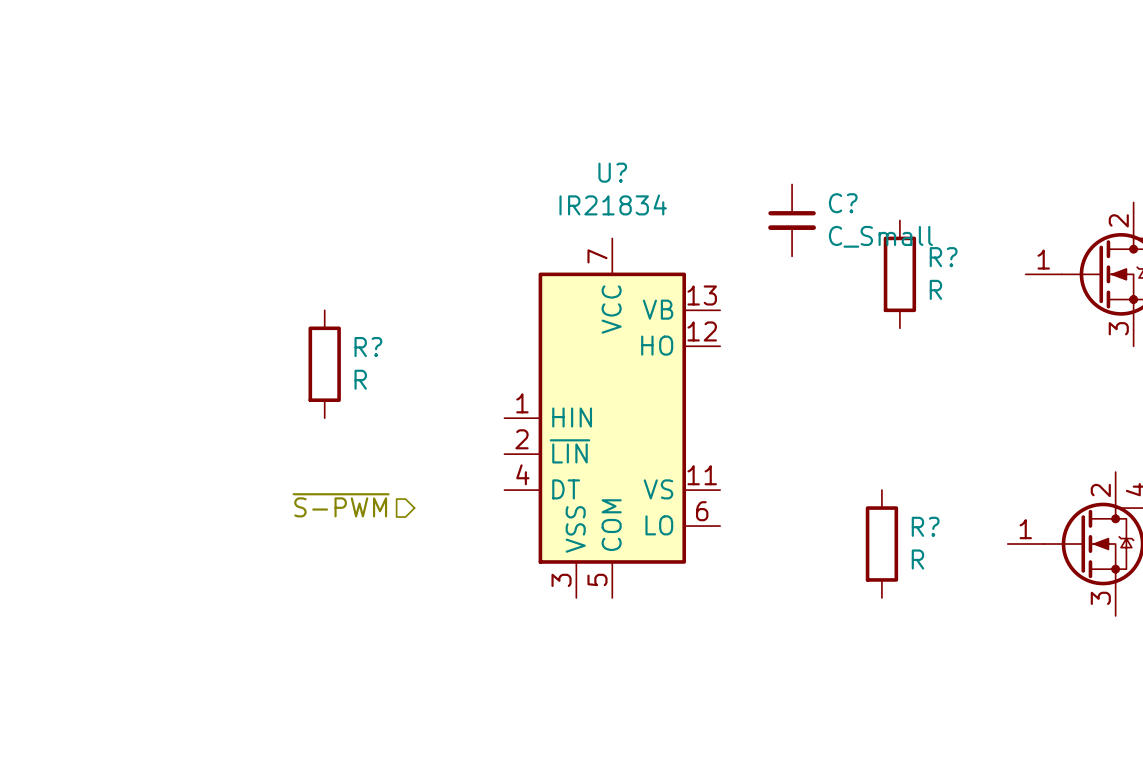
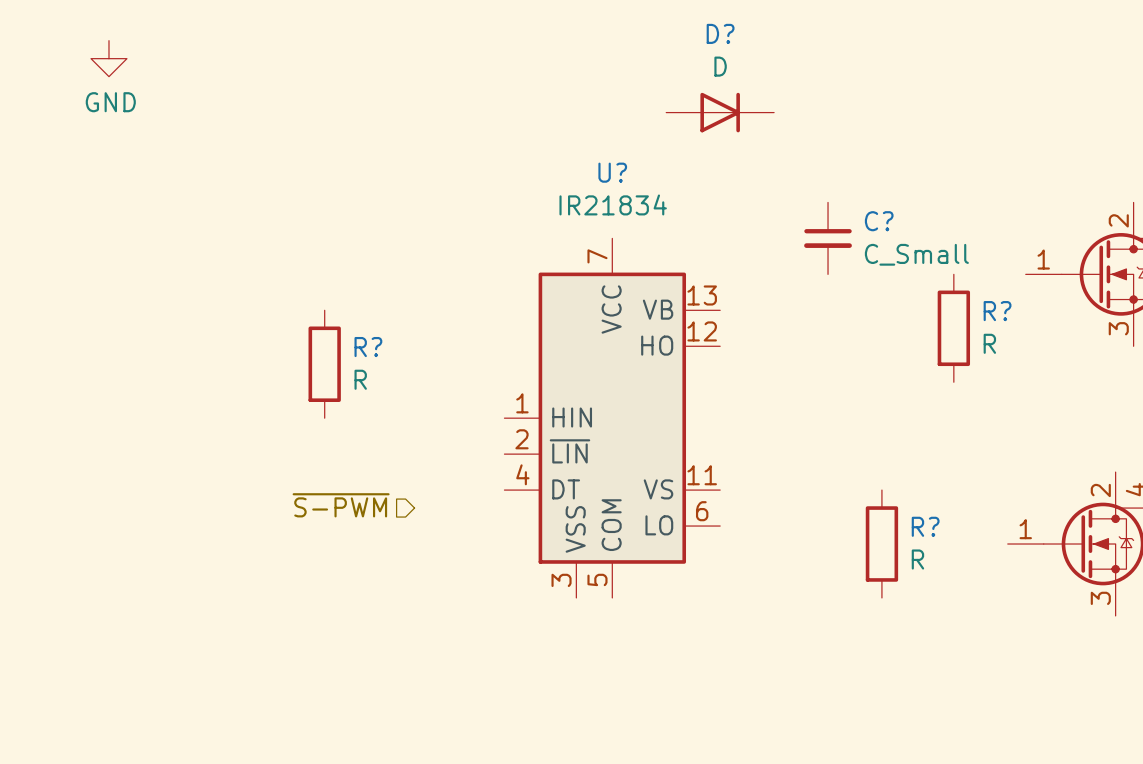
power symbol: none -> GND (108, 58)
D?: none -> D (720, 112)
C? position: (792, 220) -> (828, 238)
R? position: (899, 274) -> (953, 328)

